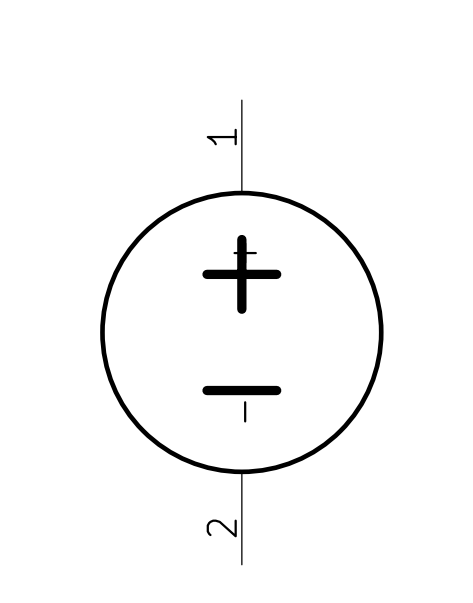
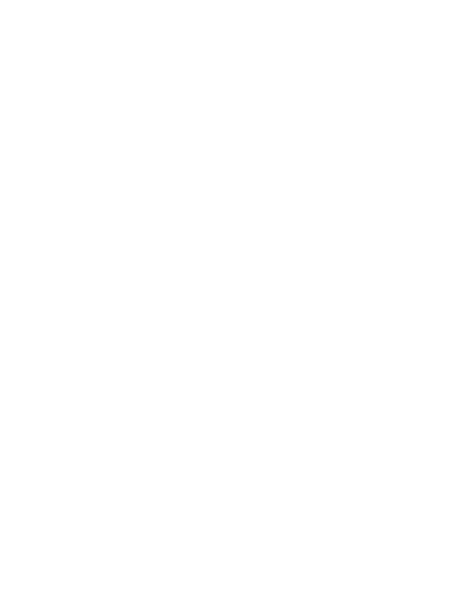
part: (241, 332) -> none

